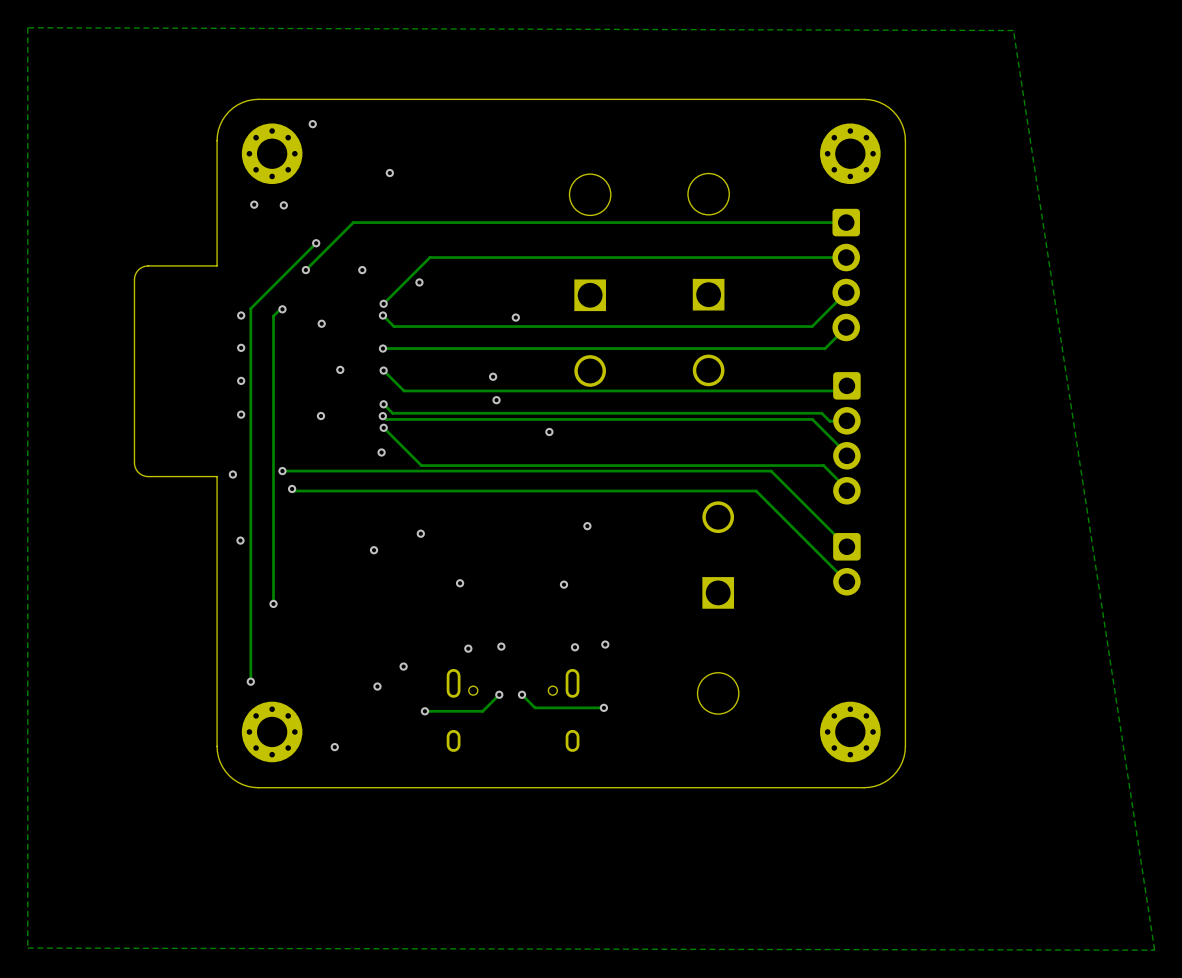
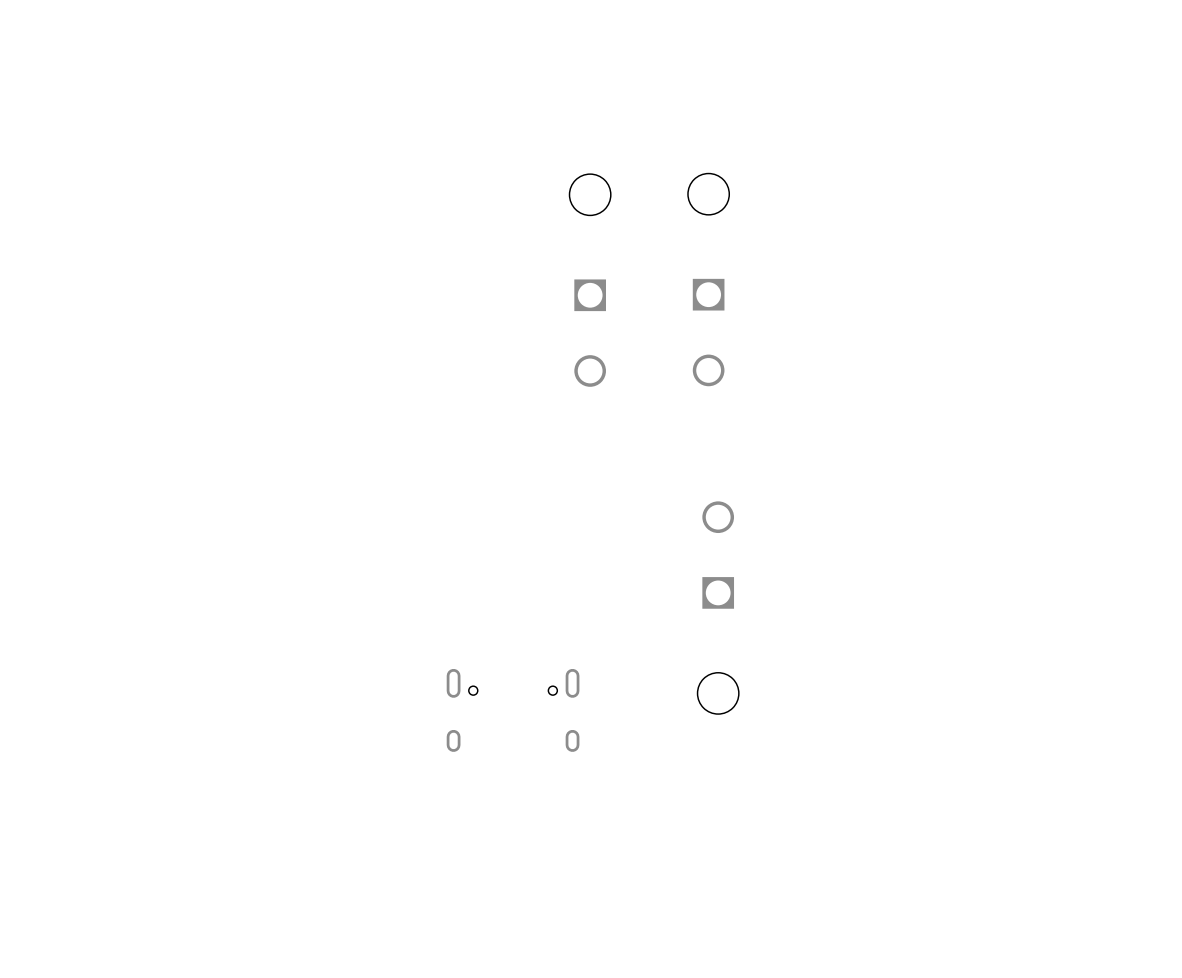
zone outline: (27, 27) (1013, 30) (1154, 950) (27, 948) (27, 27) -> none
board edge: (864, 99) (258, 99) (242, 102) (229, 111) (220, 124) (217, 135) (217, 265) (146, 266) (139, 268) (134, 276) (134, 462) (137, 471) (146, 476) (217, 476) (217, 746) (220, 762) (229, 775) (242, 784) (258, 787) (864, 787) (879, 784) (893, 775) (902, 762) (905, 746) (905, 140) (902, 124) (893, 111) (879, 102) (864, 99) -> none
via: (312, 124) -> none
part: (272, 153) -> none
part: (850, 153) -> none
via: (389, 173) -> none
via: (254, 204) -> none
via: (283, 205) -> none
track: (846, 222) (353, 222) (305, 270) -> none
track: (316, 243) (250, 308) (250, 681) -> none
via: (316, 243) -> none
track: (846, 257) (429, 257) (383, 303) -> none
via: (305, 270) -> none
via: (362, 270) -> none
part: (846, 275) -> none
via: (419, 282) -> none
track: (846, 292) (812, 326) (393, 326) (382, 315) -> none
via: (383, 303) -> none
track: (282, 309) (273, 316) (273, 603) -> none
via: (282, 309) -> none
via: (241, 315) -> none
via: (382, 315) -> none
via: (515, 317) -> none
via: (321, 323) -> none
track: (846, 327) (825, 348) (382, 348) -> none
via: (241, 347) -> none
via: (382, 348) -> none
via: (340, 369) -> none
track: (383, 370) (404, 390) (844, 390) (849, 386) -> none
via: (383, 370) -> none
via: (493, 376) -> none
via: (241, 380) -> none
via: (496, 400) -> none
track: (383, 404) (392, 413) (821, 413) (829, 421) (849, 421) -> none
via: (383, 404) -> none
via: (241, 414) -> none
via: (321, 416) -> none
track: (382, 416) (386, 419) (812, 419) (849, 456) -> none
via: (382, 416) -> none
track: (383, 427) (421, 465) (823, 465) (849, 491) -> none
via: (383, 427) -> none
via: (549, 432) -> none
part: (846, 438) -> none
via: (381, 452) -> none
track: (282, 471) (771, 471) (846, 546) -> none
via: (282, 471) -> none
via: (232, 474) -> none
track: (292, 488) (294, 491) (756, 491) (846, 581) -> none
via: (292, 488) -> none
via: (587, 526) -> none
via: (420, 533) -> none
via: (240, 540) -> none
via: (374, 550) -> none
part: (846, 564) -> none
via: (460, 583) -> none
via: (564, 584) -> none
via: (273, 603) -> none
via: (605, 644) -> none
via: (501, 646) -> none
via: (575, 647) -> none
via: (468, 648) -> none
via: (403, 666) -> none
via: (250, 681) -> none
via: (377, 686) -> none
track: (499, 694) (482, 711) (424, 711) -> none
via: (499, 694) -> none
track: (522, 694) (535, 707) (603, 707) -> none
via: (522, 694) -> none
via: (603, 707) -> none
via: (424, 711) -> none
part: (272, 731) -> none
part: (850, 731) -> none
via: (334, 747) -> none

